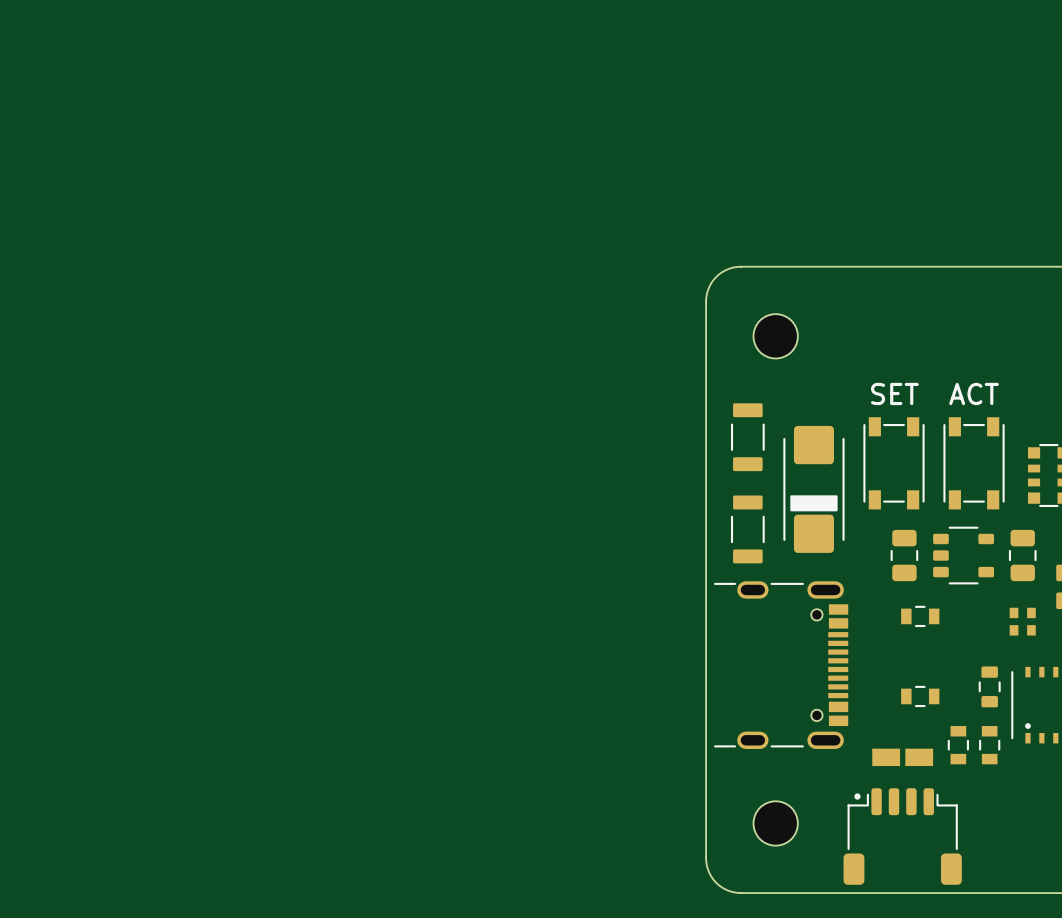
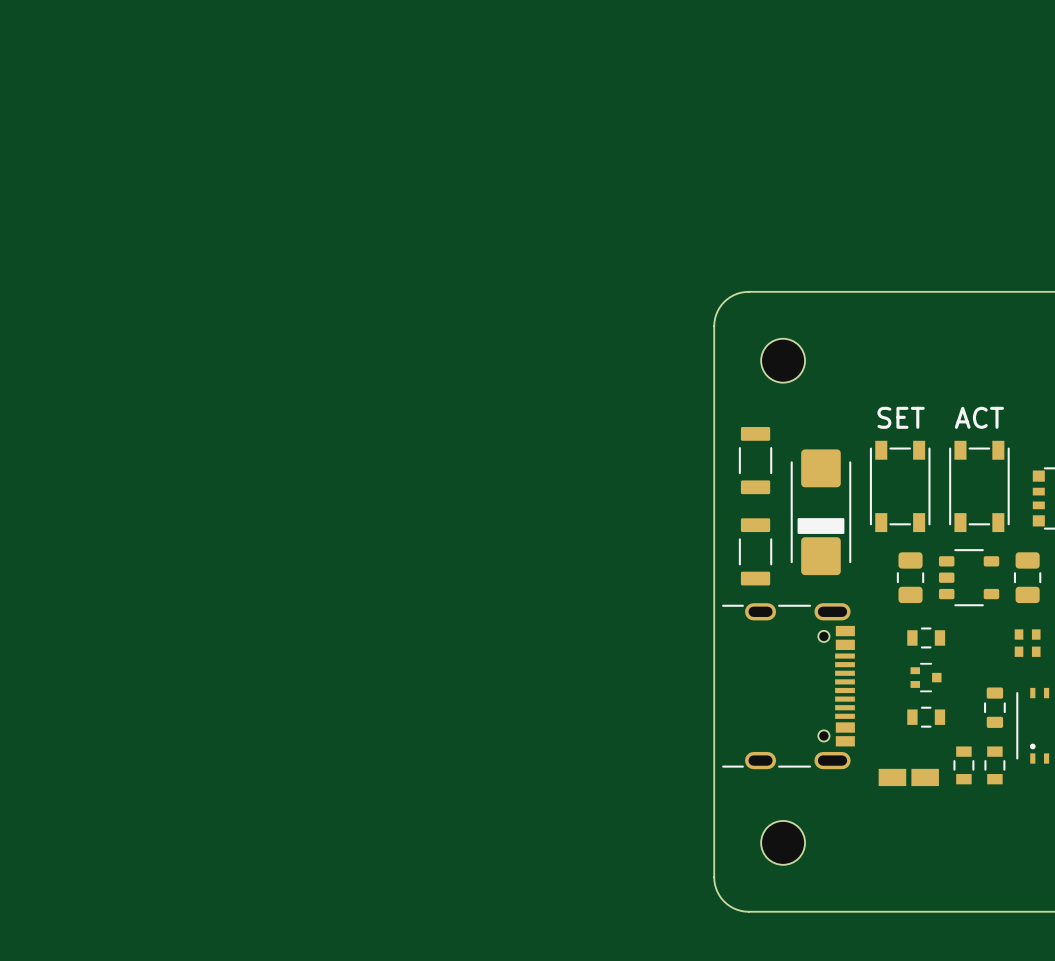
part: none -> (926, 677)
part: (902, 836) -> none

